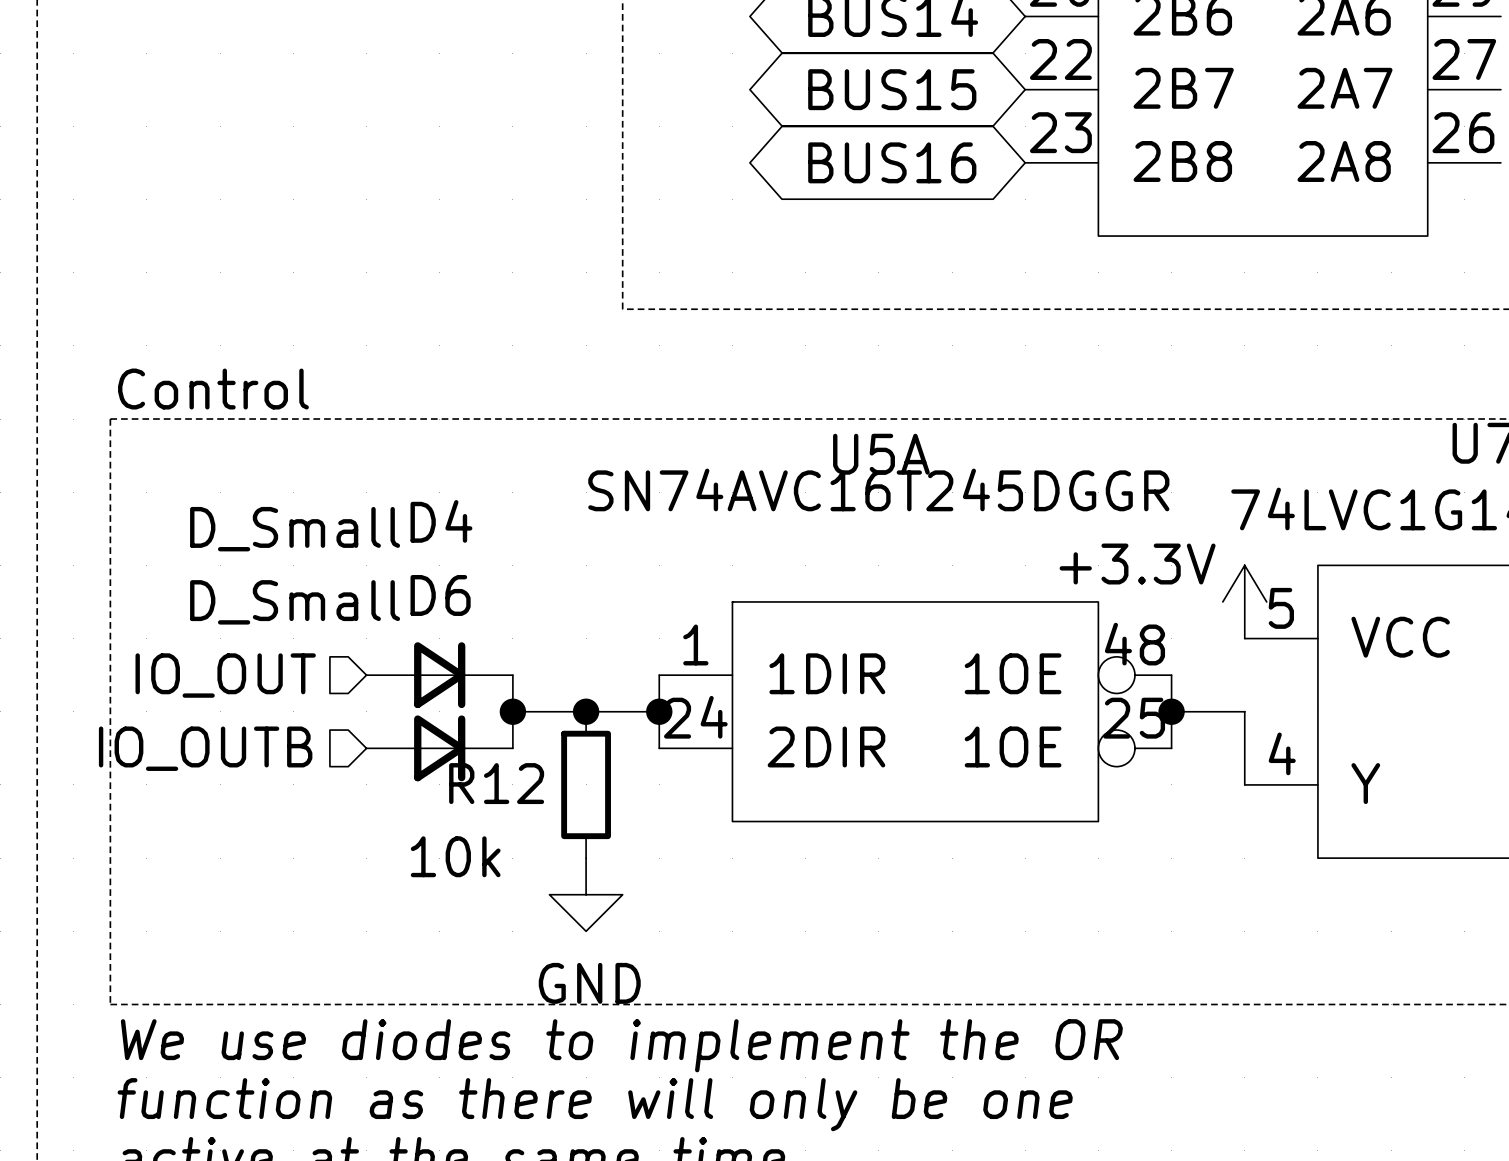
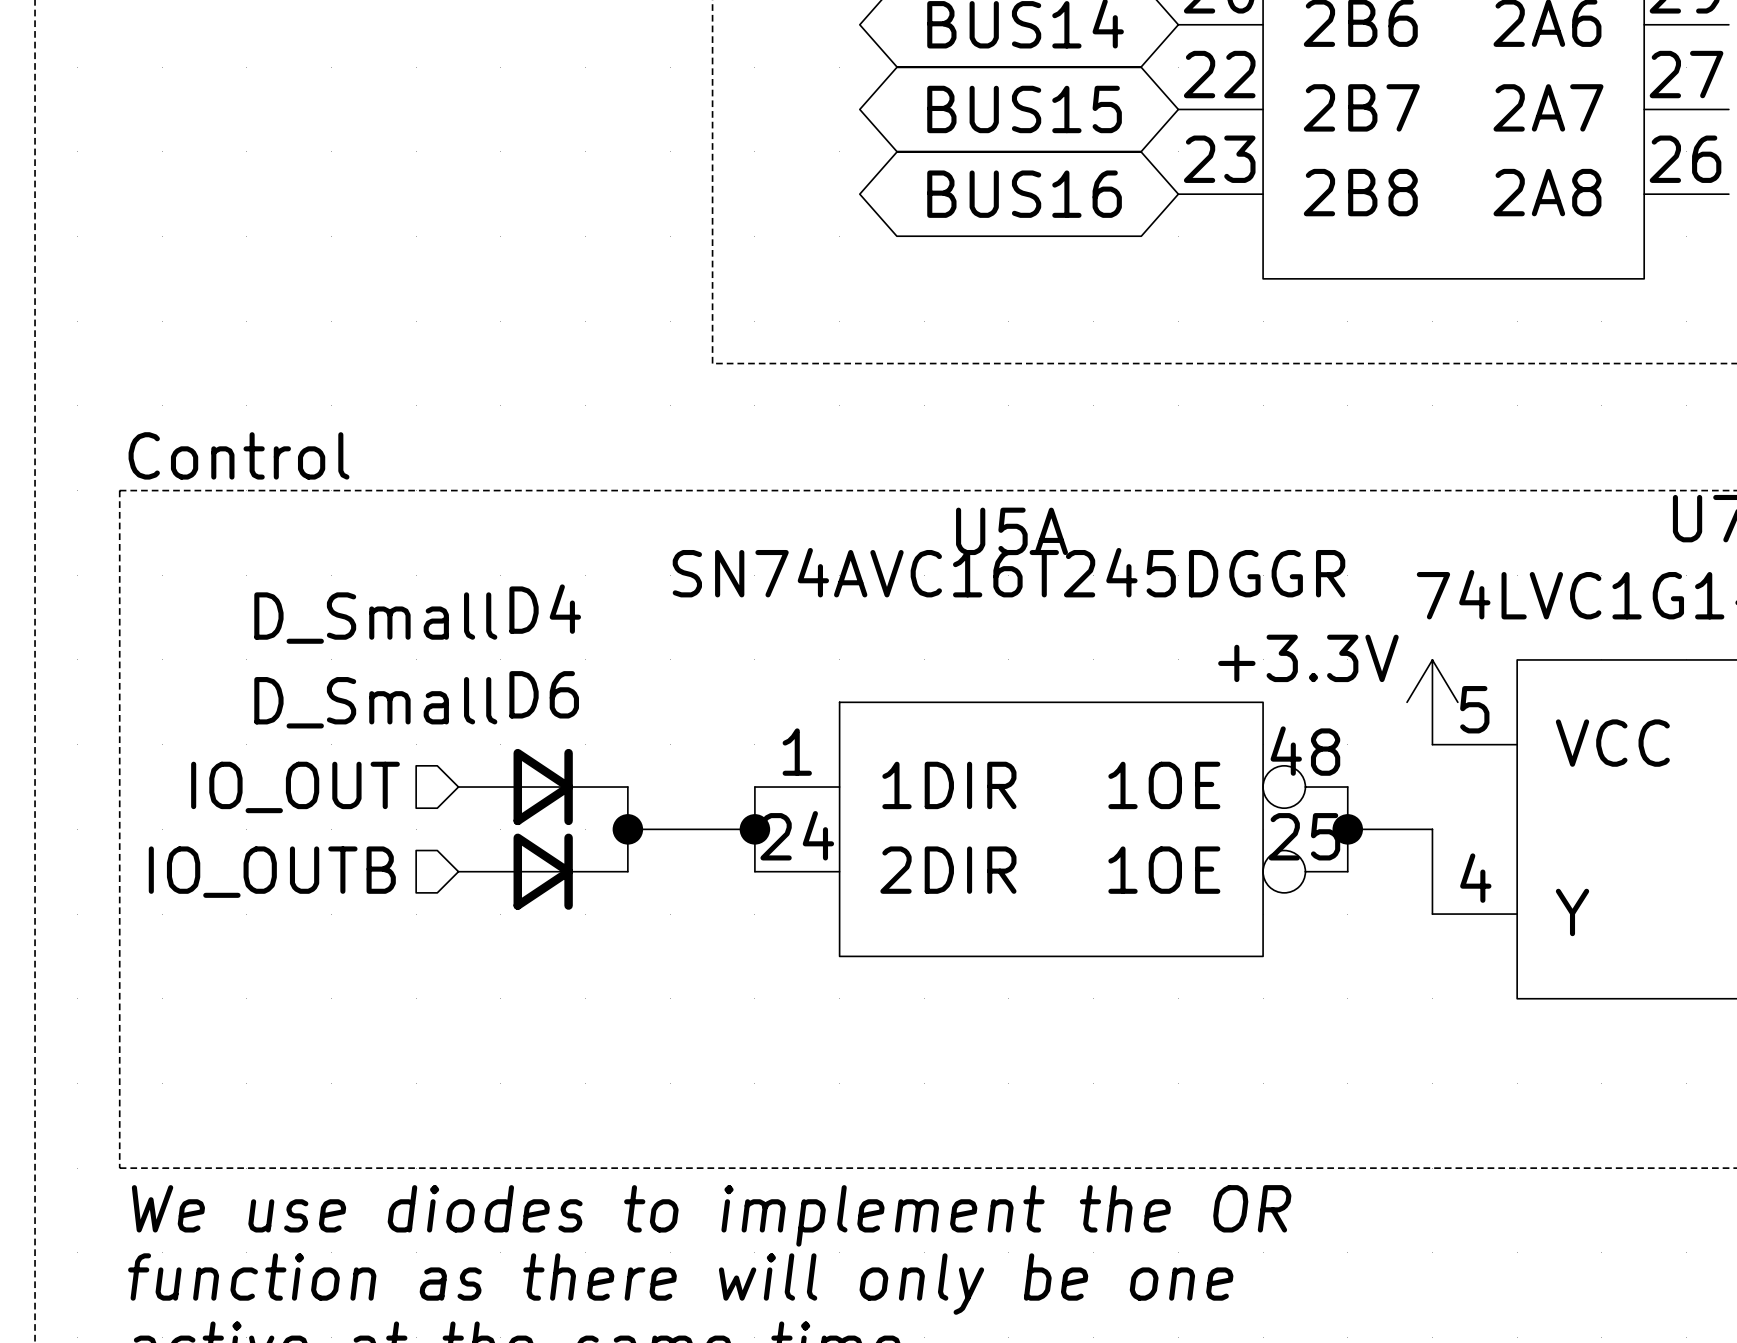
hierarchical label position: IO_OUT (225, 675) -> IO_OUT (295, 787)
D4 position: (439, 675) -> (543, 787)
wire: (512, 675) (512, 748) -> (627, 787) (627, 871)
wire: (512, 711) (549, 711) -> none
junction: (512, 711) -> none
junction: none -> (627, 829)
junction: (586, 711) -> none
hierarchical label position: IO_OUTB (205, 748) -> IO_OUTB (272, 872)
D6 position: (439, 748) -> (543, 871)
R12: 10k (586, 784) -> none
power symbol: GND (586, 894) -> none

